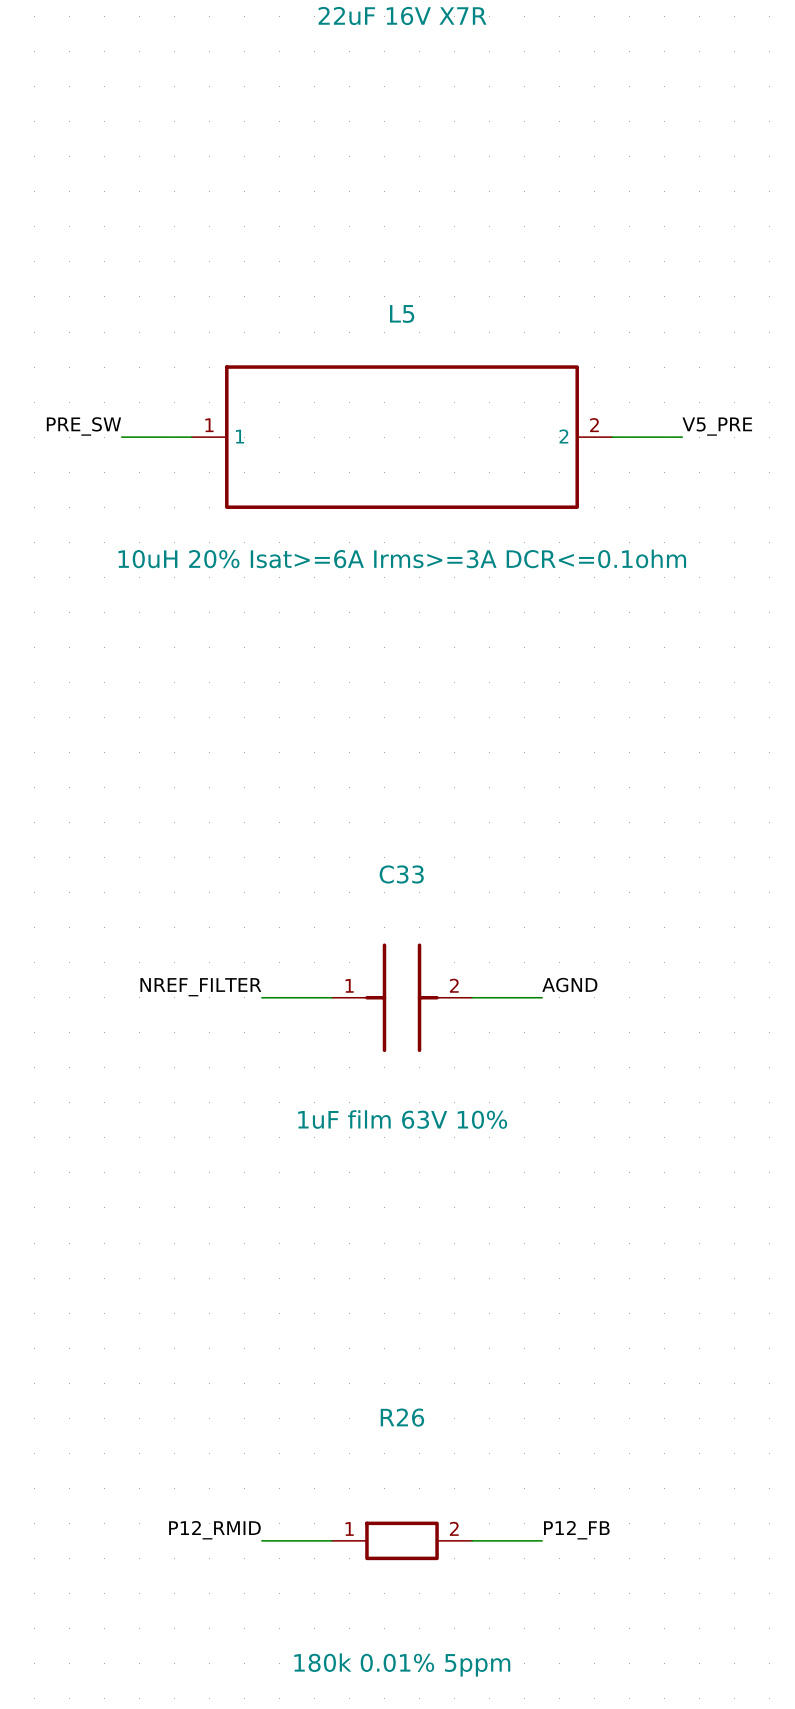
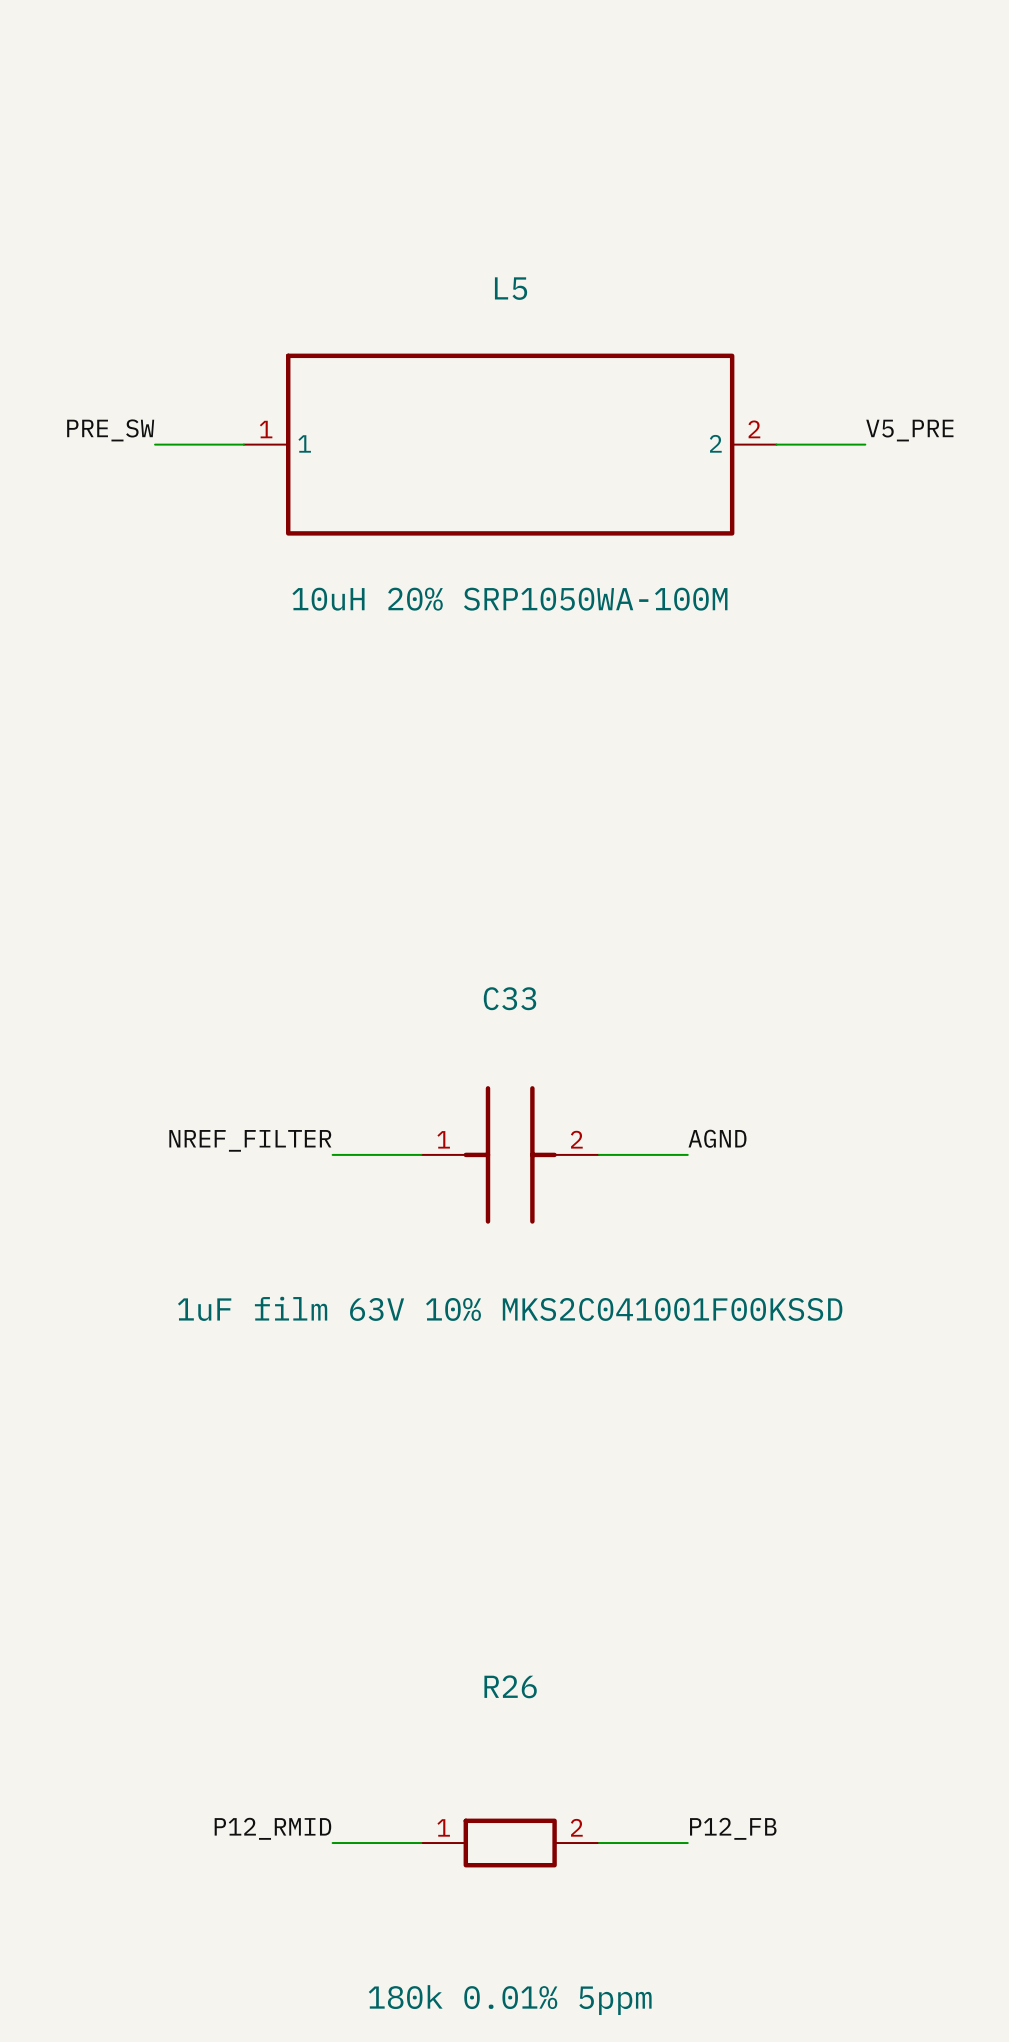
L5 value: 10uH 20% Isat>=6A Irms>=3A DCR<=0.1ohm (402, 558) -> 10uH 20% SRP1050WA-100M (509, 599)
C33 value: 1uF film 63V 10% (402, 1119) -> 1uF film 63V 10% MKS2C041001F00KSSD (510, 1308)

